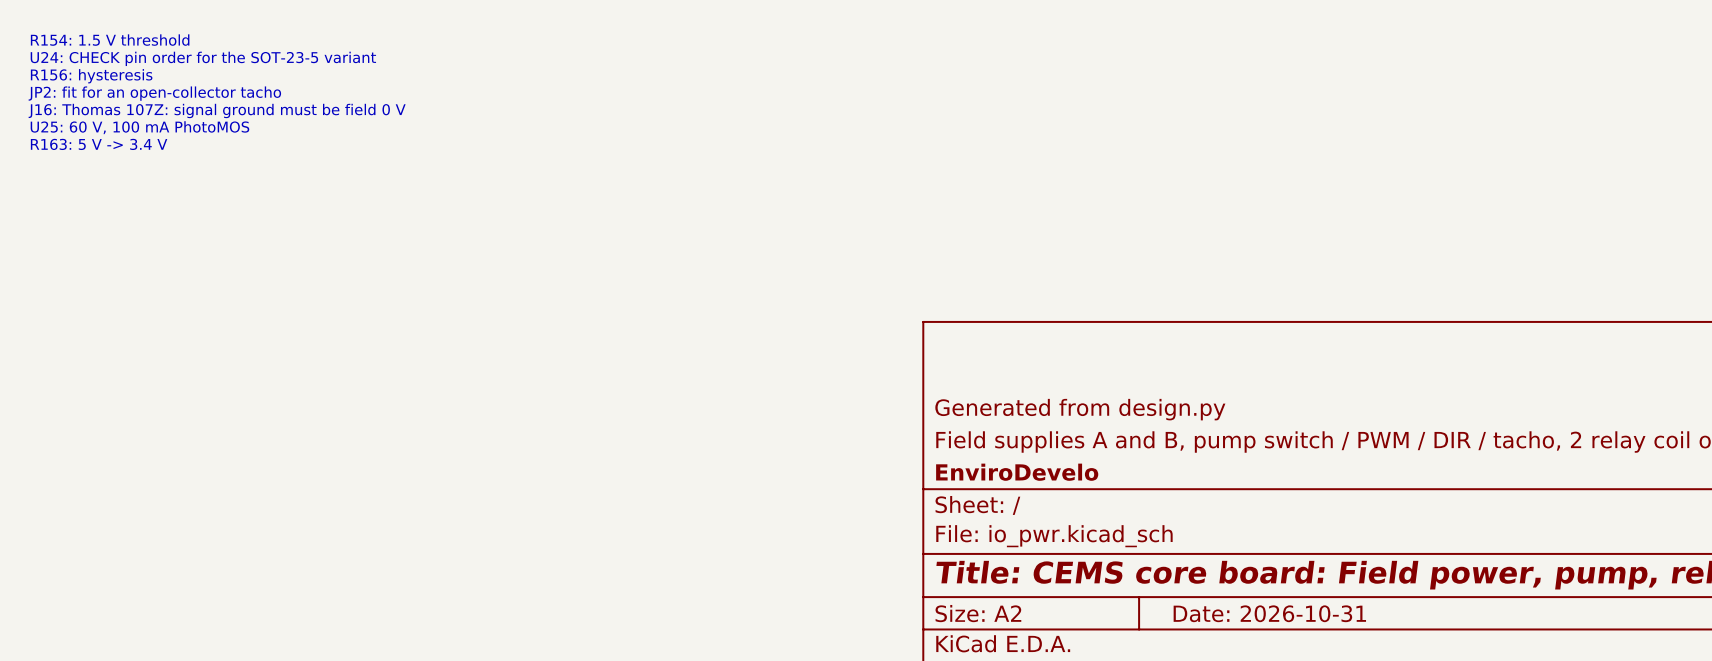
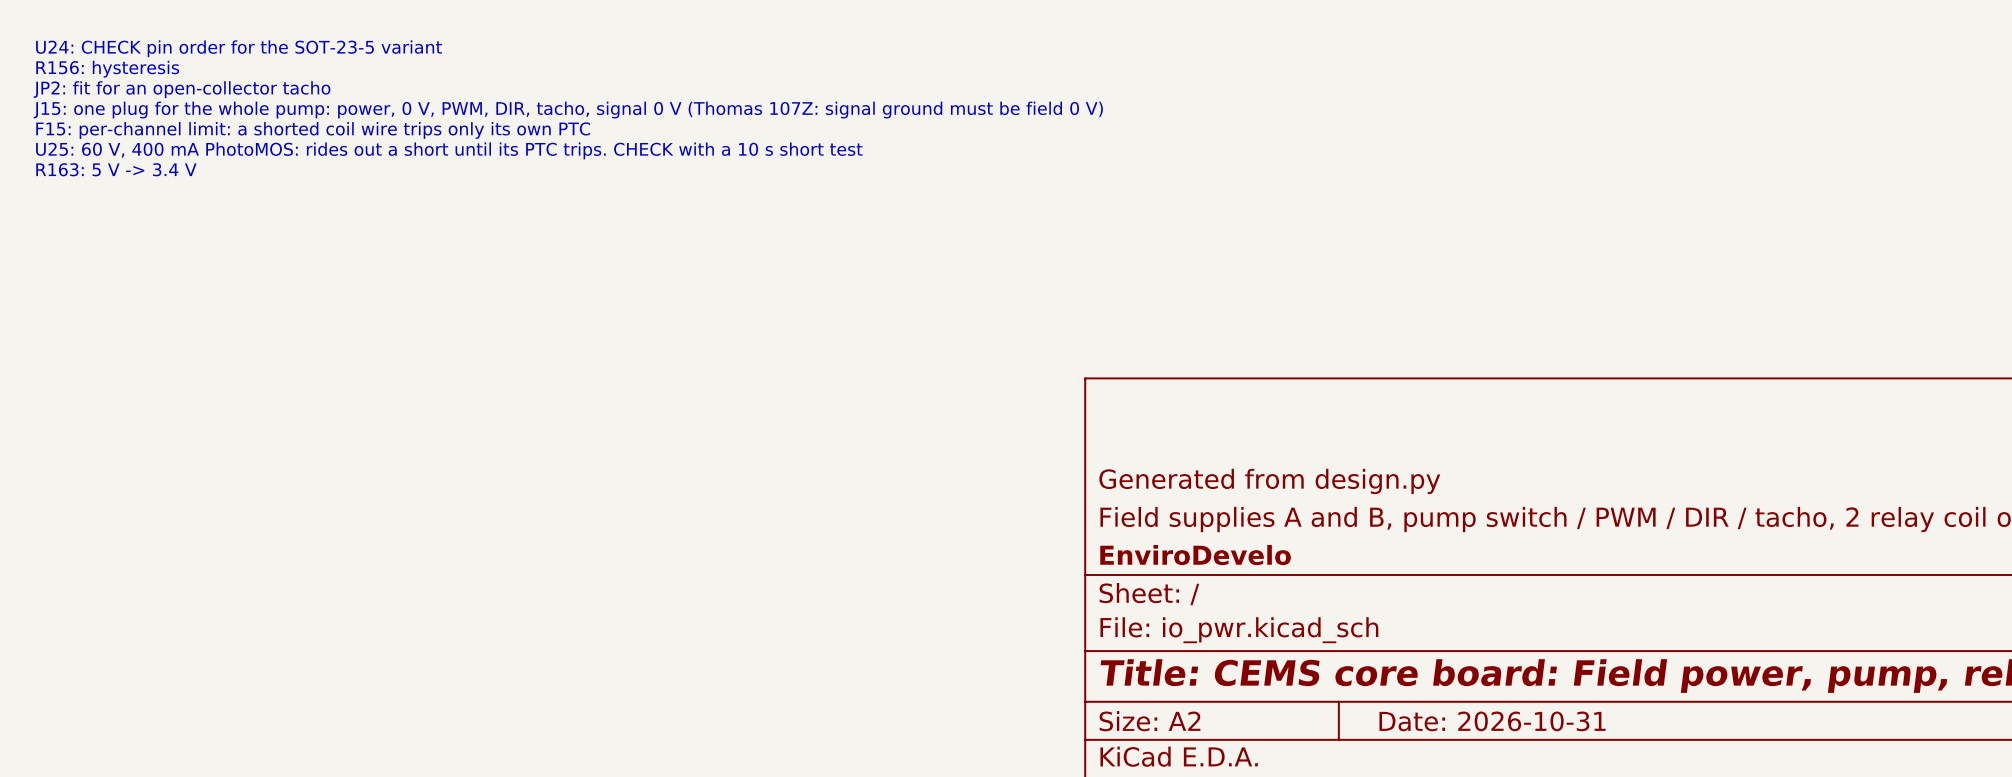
text: R154: 1.5 V threshold (110, 40) -> U24: CHECK pin order for the SOT-23-5 variant (239, 48)
text: U24: CHECK pin order for the SOT-23-5 variant (203, 58) -> R156: hysteresis (107, 69)
text: R156: hysteresis (91, 76) -> JP2: fit for an open-collector tacho (182, 89)
text: JP2: fit for an open-collector tacho (154, 93) -> J15: one plug for the whole pump: power, 0 V, PWM, DIR, tacho, signal 0 V (Thomas 107Z: signal ground must be field 0 V) (568, 110)
text: J16: Thomas 107Z: signal ground must be field 0 V (217, 110) -> F15: per-channel limit: a shorted coil wire trips only its own PTC (313, 130)
text: U25: 60 V, 100 mA PhotoMOS (139, 127) -> U25: 60 V, 400 mA PhotoMOS: rides out a short until its PTC trips. CHECK with a 10 s short test (449, 150)

